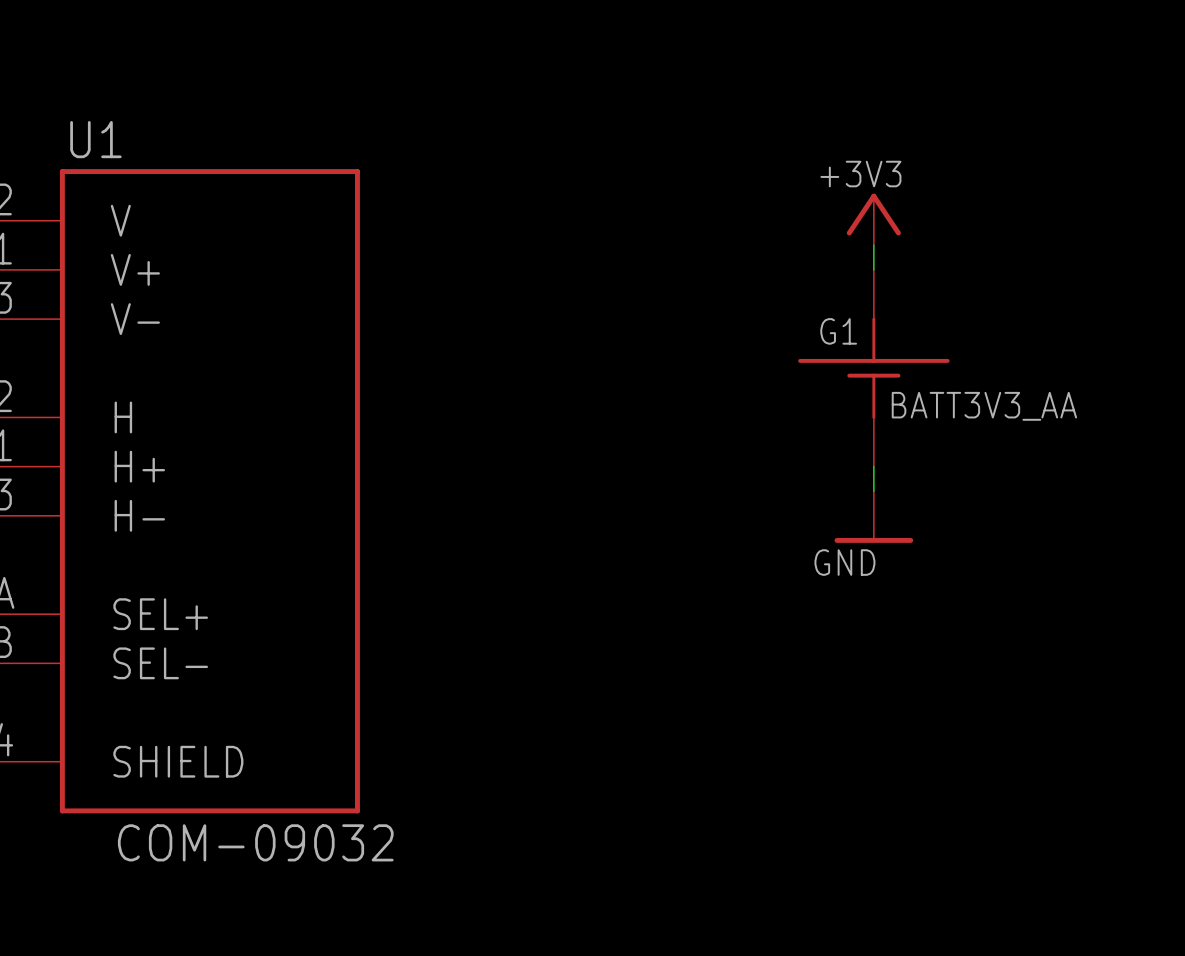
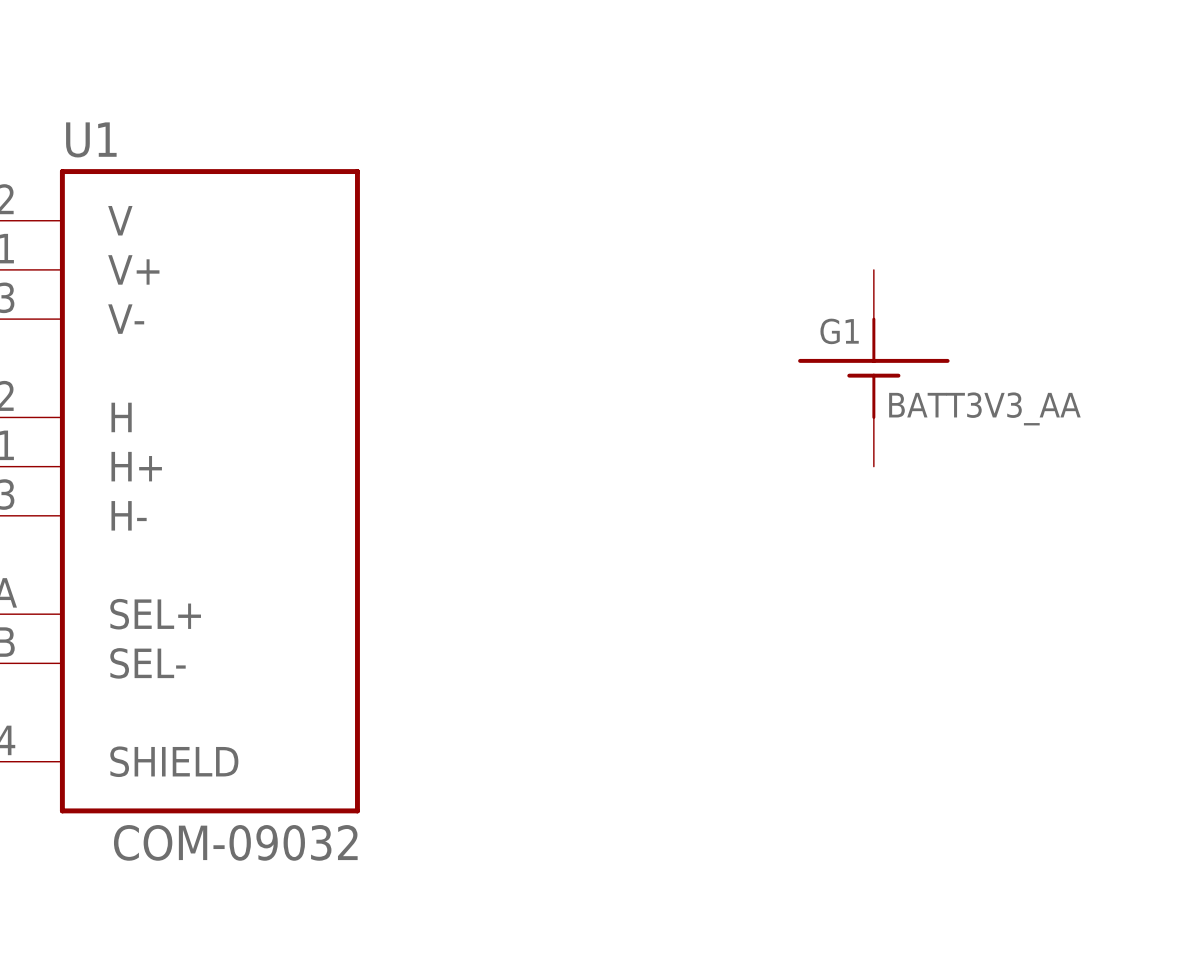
power symbol: +3V3 (873, 219) -> none
wire: (873, 245) (873, 269) -> none
wire: (873, 466) (873, 491) -> none
power symbol: GND (873, 517) -> none

